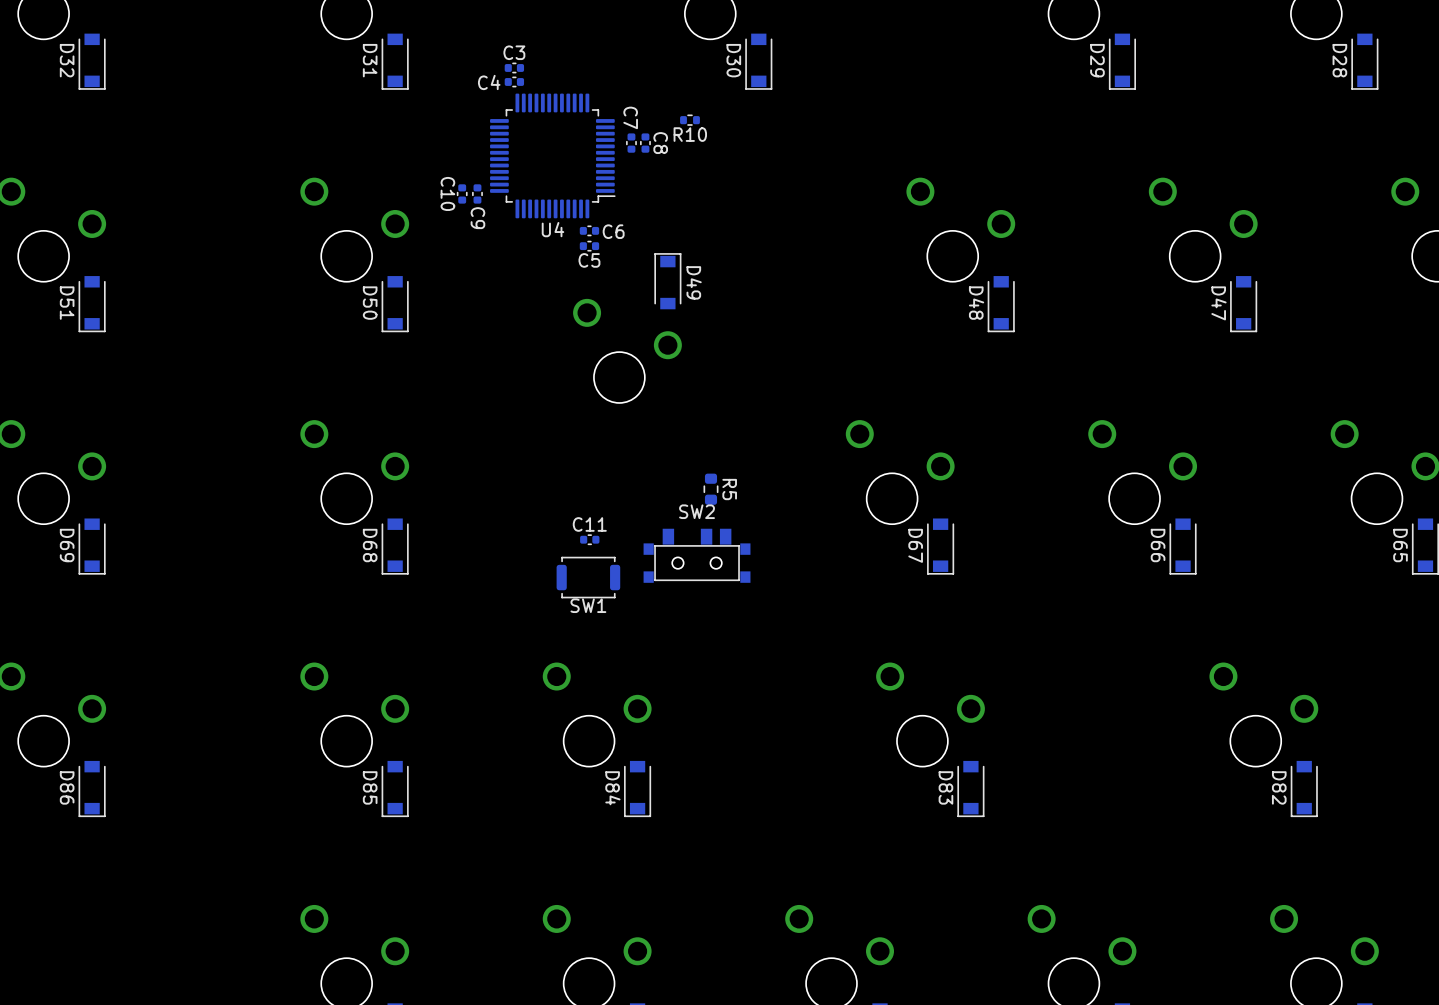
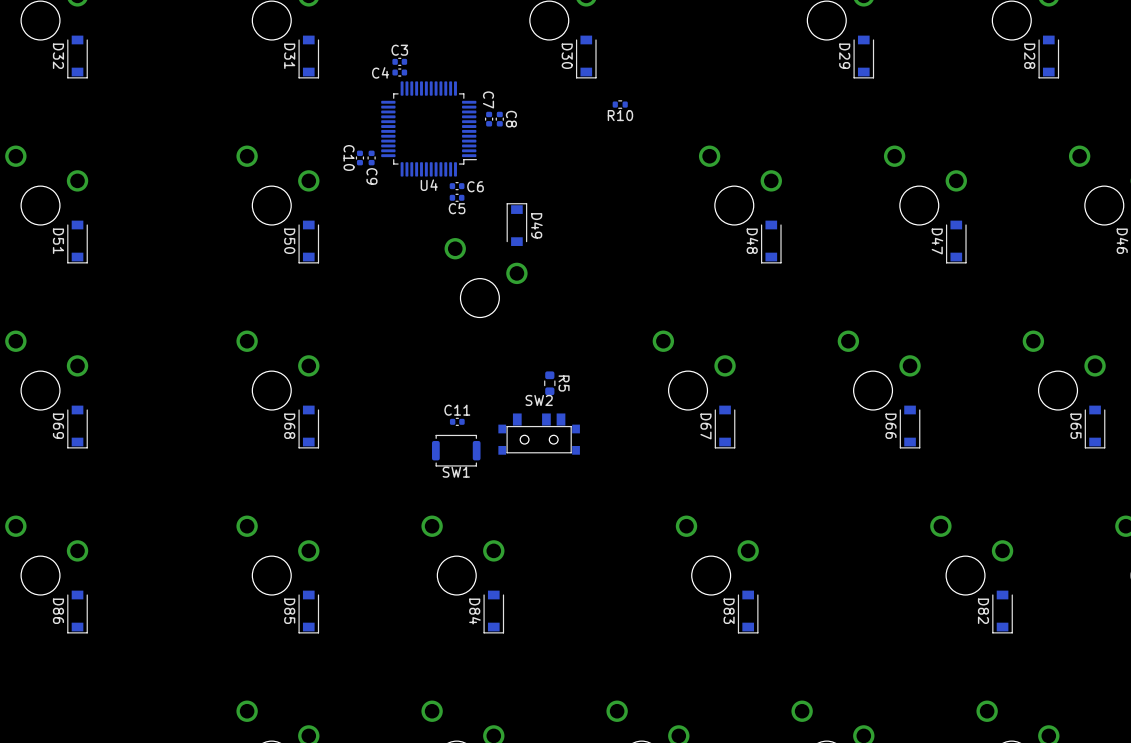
R10 position: (689, 120) -> (620, 104)

